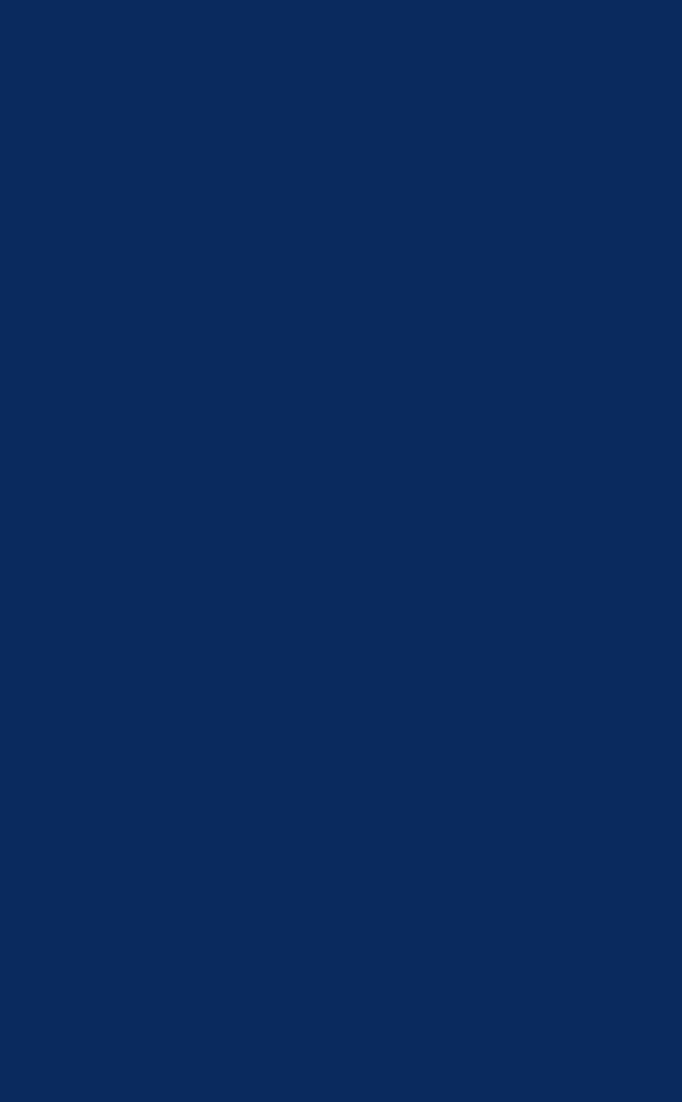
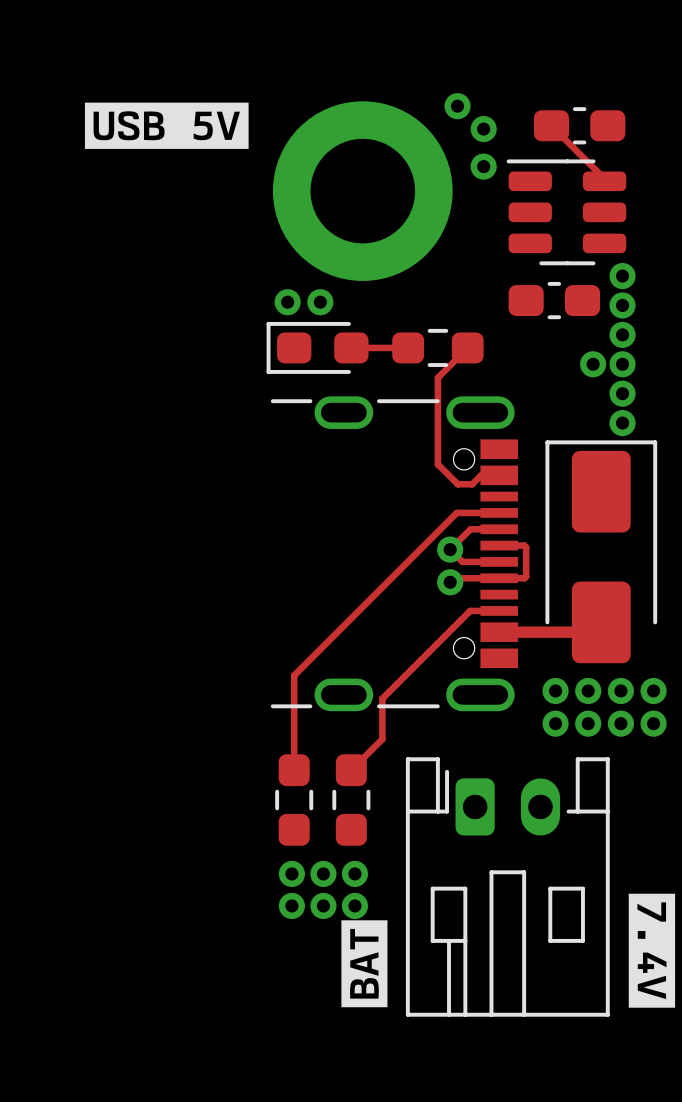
drawing: none -> [84, 102, 249, 149]
via: none -> (457, 106)
track: none -> (551, 125) (604, 178) (604, 181)
part: none -> (579, 125)
via: none -> (483, 129)
via: none -> (483, 166)
part: none -> (362, 191)
part: none -> (566, 212)
via: none -> (622, 276)
part: none -> (554, 300)
via: none -> (287, 302)
via: none -> (320, 302)
via: none -> (622, 305)
via: none -> (622, 334)
part: none -> (317, 347)
track: none -> (351, 347) (408, 347)
part: none -> (437, 347)
track: none -> (467, 347) (437, 377) (437, 464) (457, 484) (472, 484) (481, 475) (499, 475)
via: none -> (593, 364)
via: none -> (622, 364)
via: none -> (622, 393)
via: none -> (622, 423)
track: none -> (499, 512) (456, 512) (294, 675) (294, 770)
track: none -> (499, 529) (470, 529) (450, 549) (462, 561) (499, 561)
track: none -> (499, 545) (524, 545) (526, 547) (526, 576) (524, 578) (454, 578) (450, 582)
via: none -> (450, 549)
part: none -> (601, 551)
part: none -> (394, 553)
via: none -> (450, 582)
track: none -> (499, 610) (470, 610) (382, 698) (382, 739) (351, 770)
track: none -> (601, 622) (591, 632) (499, 632)
via: none -> (555, 690)
via: none -> (588, 690)
via: none -> (620, 690)
via: none -> (653, 690)
via: none -> (555, 723)
via: none -> (588, 723)
via: none -> (620, 723)
via: none -> (653, 723)
part: none -> (294, 800)
part: none -> (351, 800)
via: none -> (291, 873)
via: none -> (323, 873)
via: none -> (354, 873)
part: none -> (507, 887)
drawing: none -> [628, 893, 676, 1008]
via: none -> (291, 905)
via: none -> (323, 905)
via: none -> (354, 905)
drawing: none -> [341, 920, 388, 1008]

